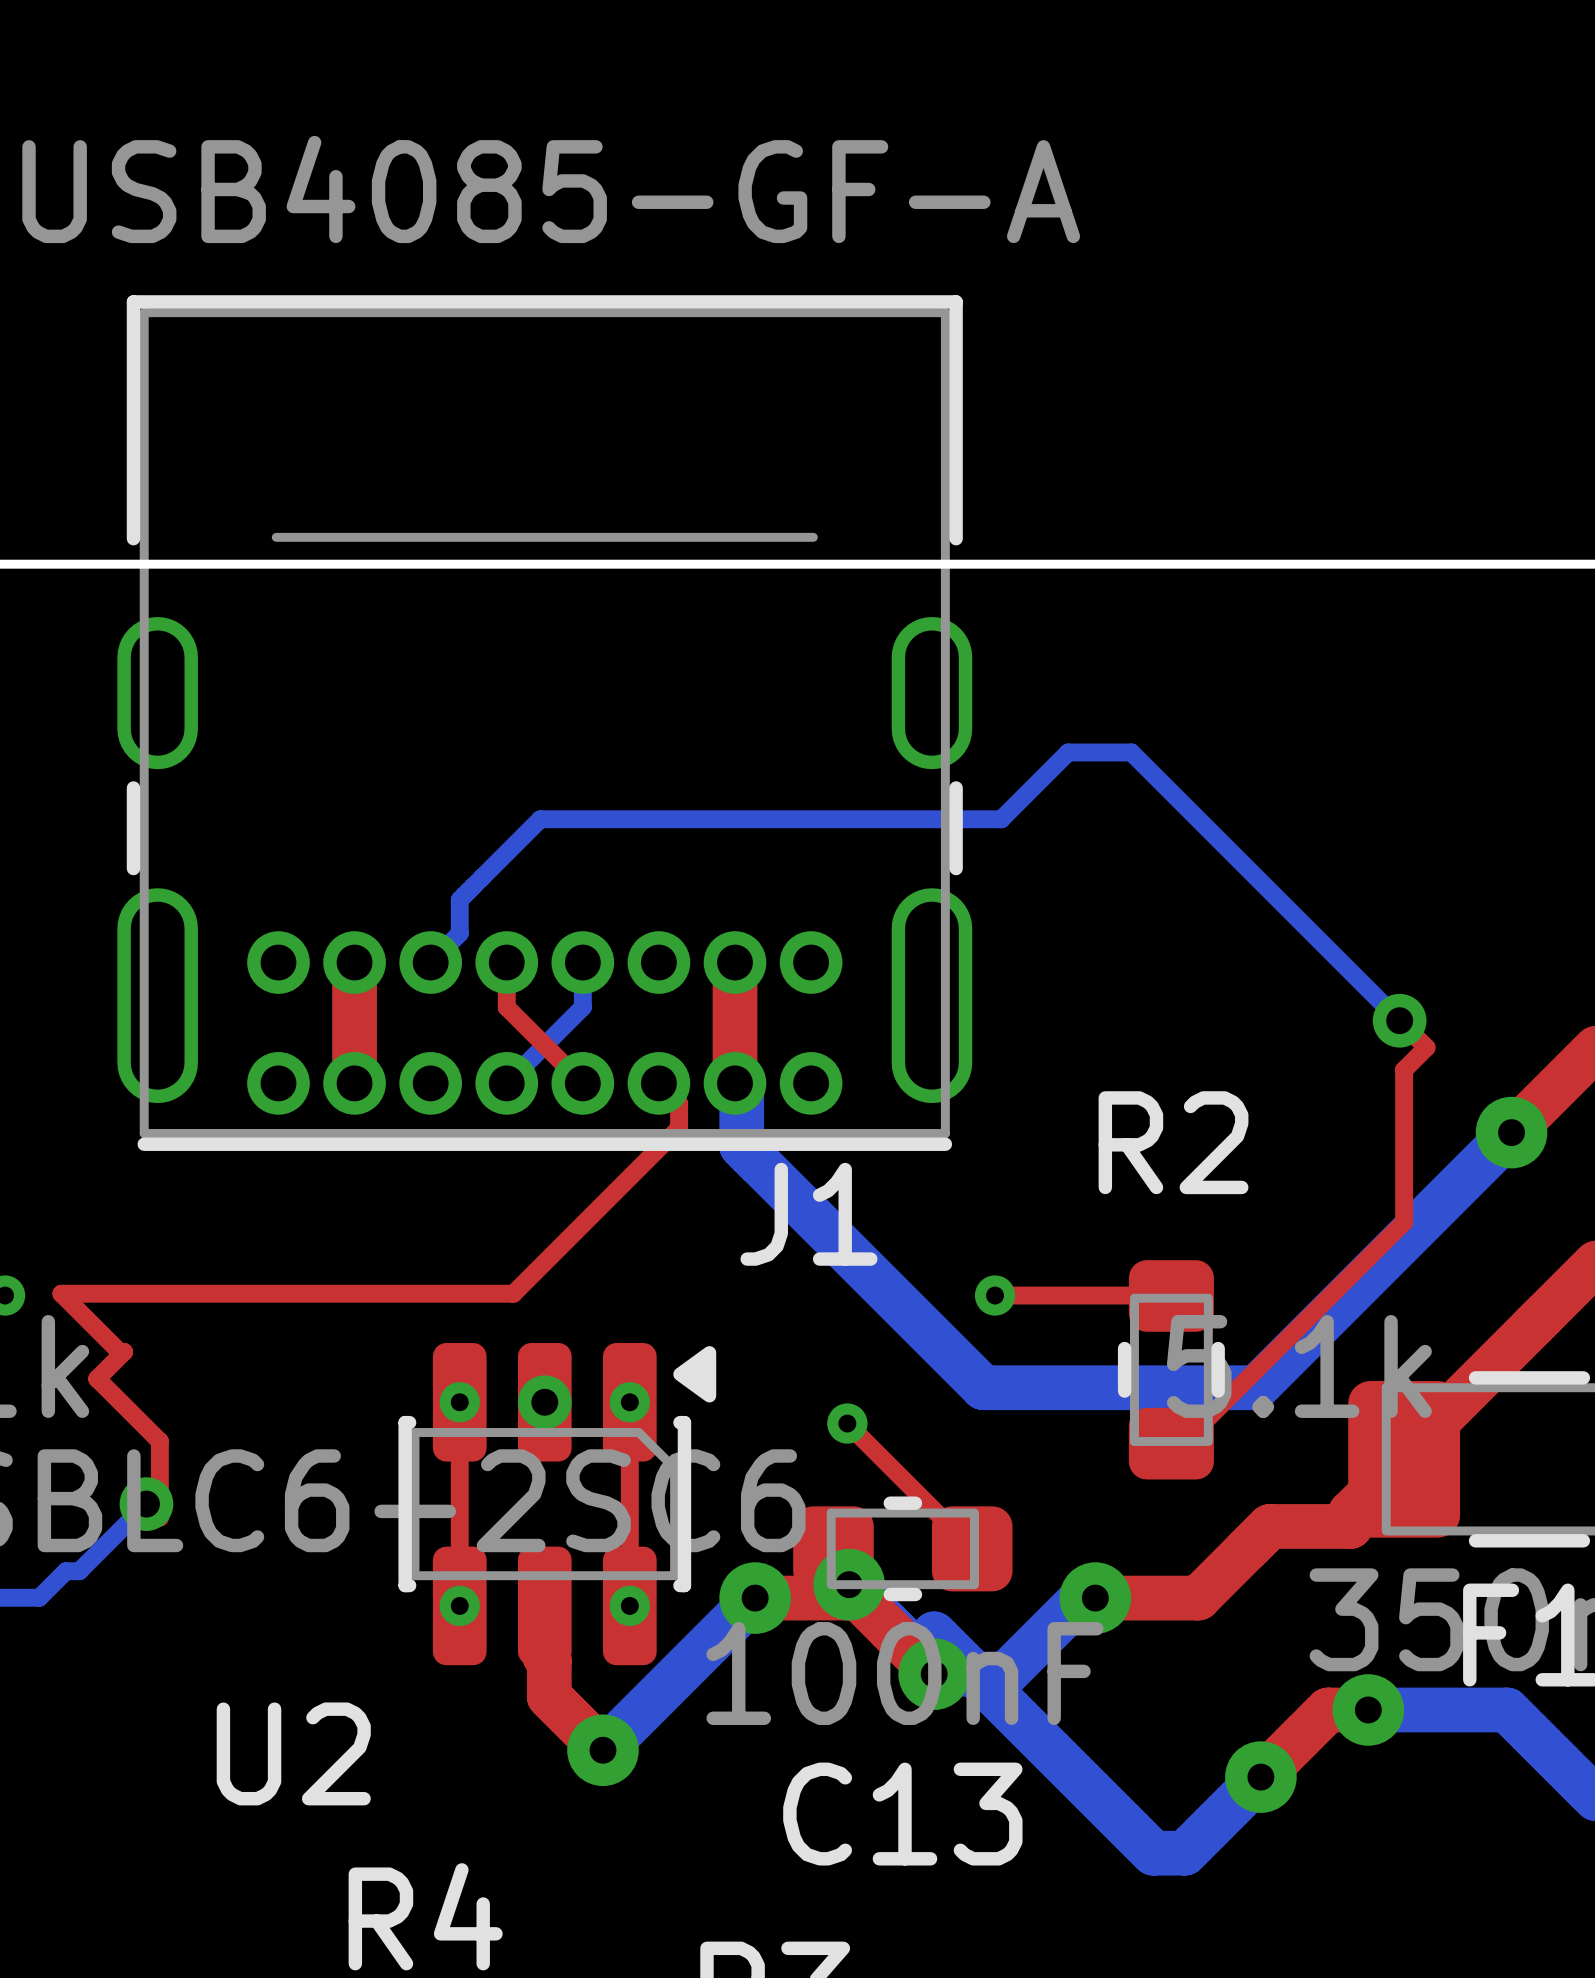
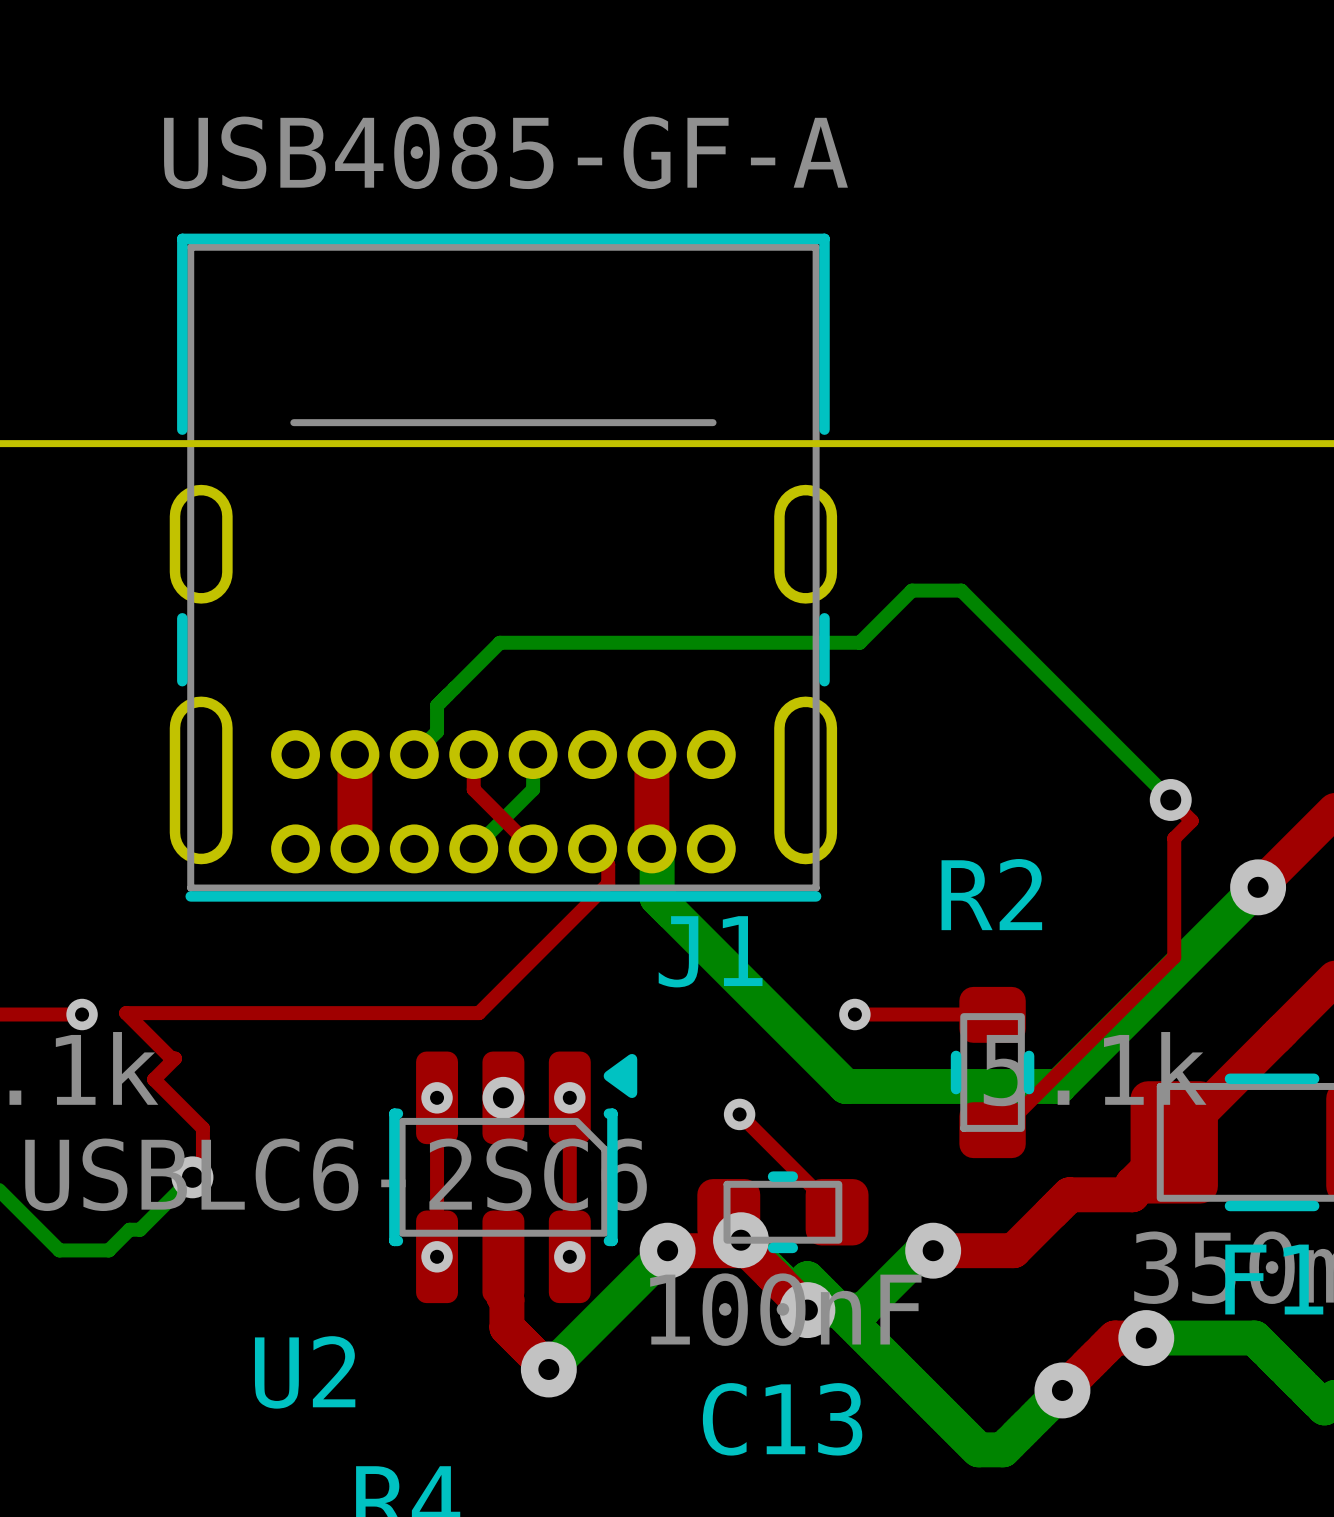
J1 footprint: [117, 295, 973, 1151] -> [169, 233, 838, 902]

